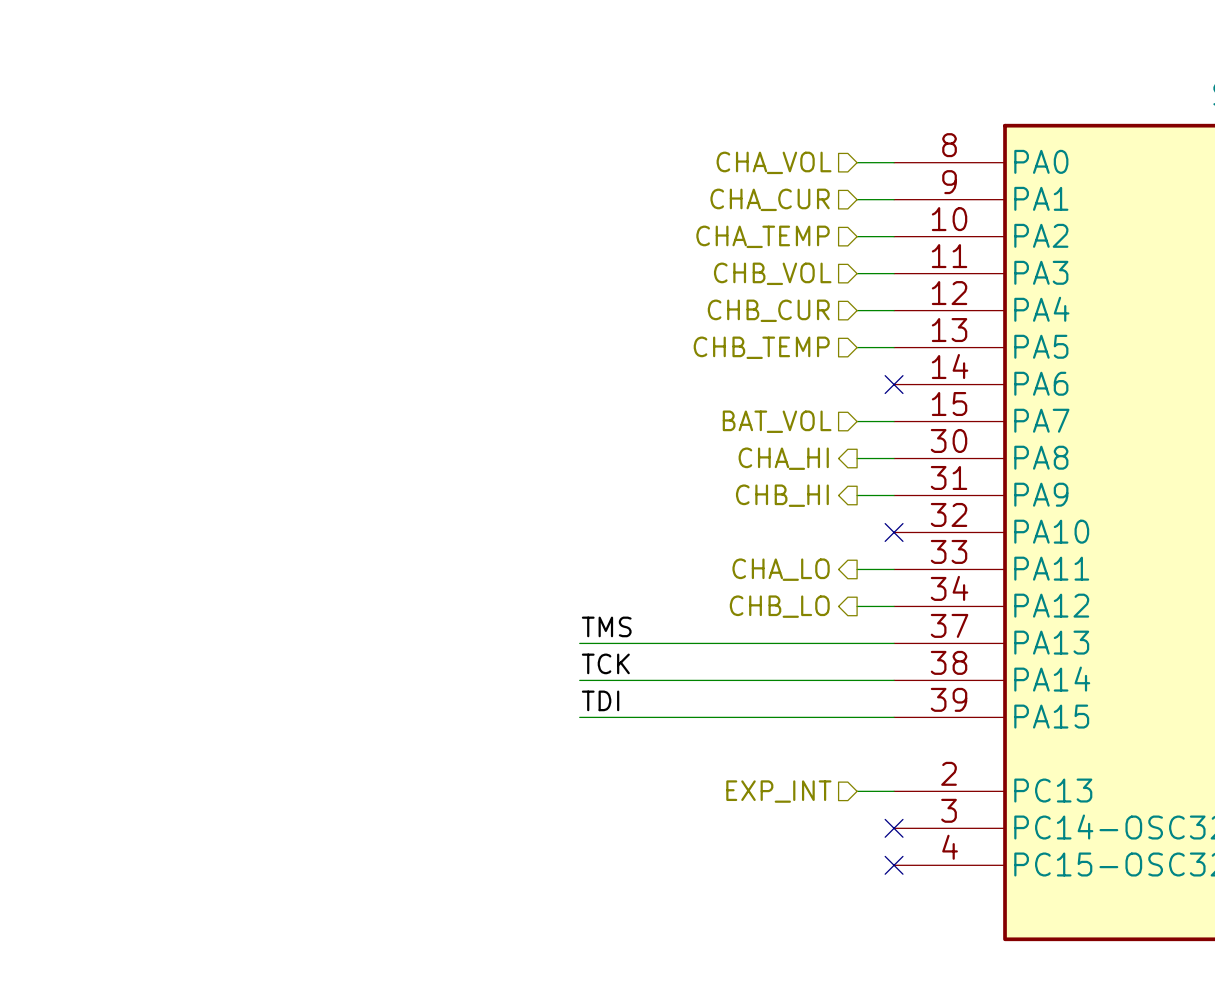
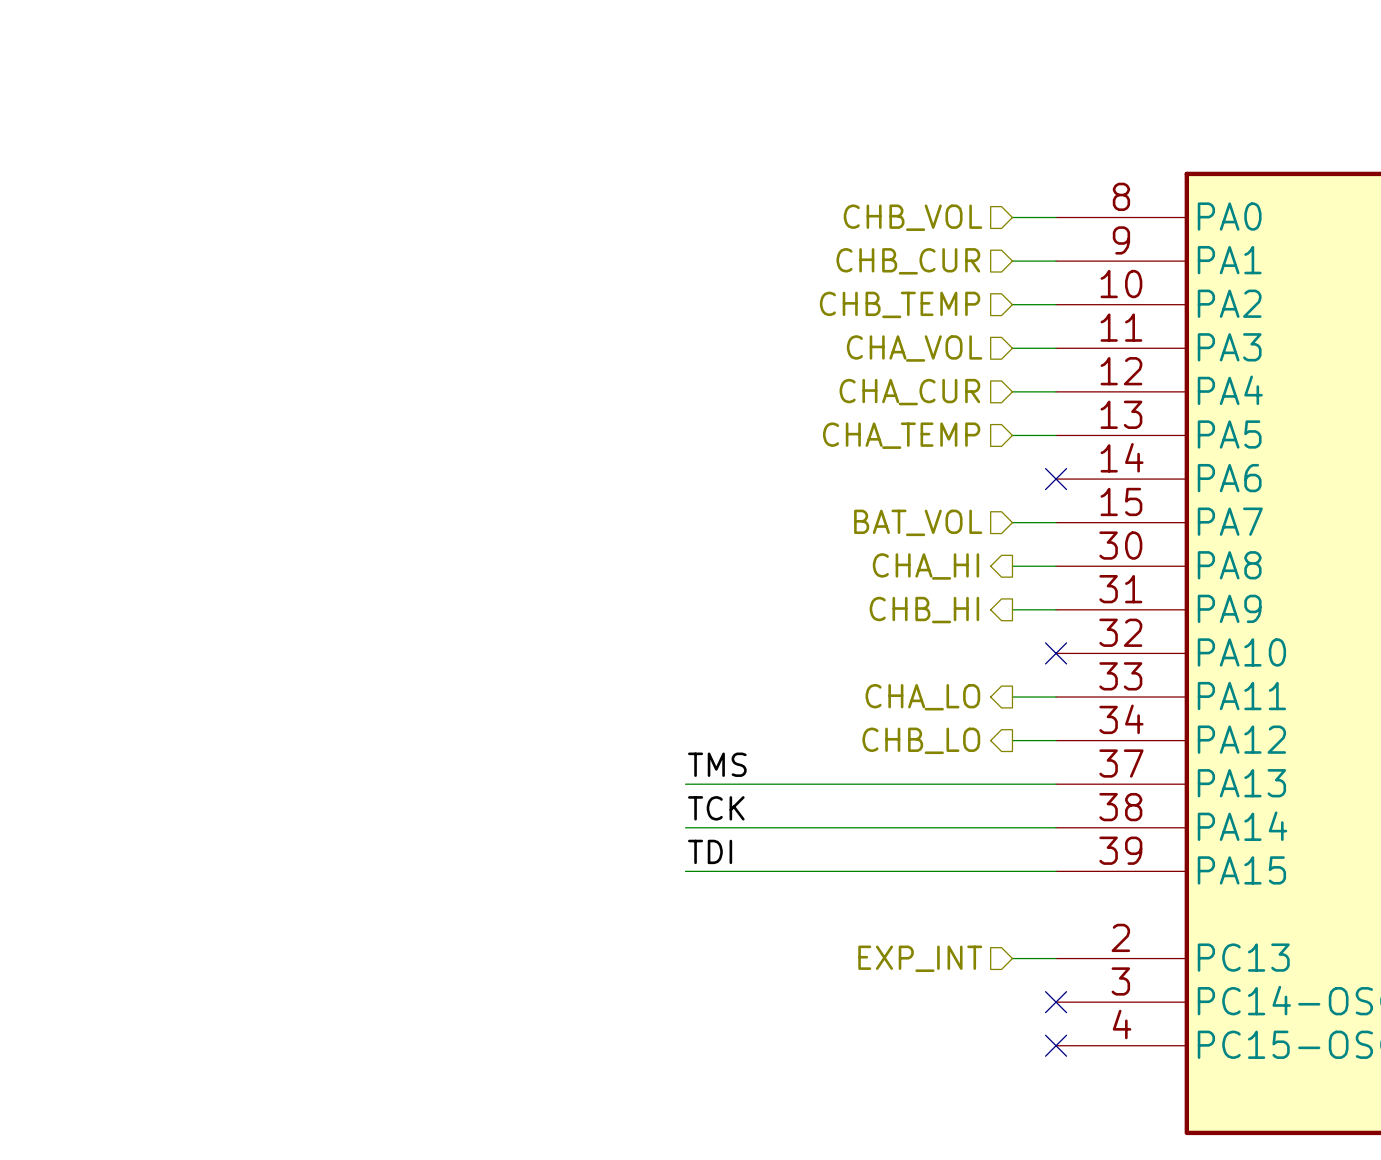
hierarchical label: CHA_VOL (774, 162) -> CHB_VOL (913, 217)
hierarchical label: CHA_CUR (770, 199) -> CHB_CUR (908, 261)
hierarchical label: CHA_TEMP (763, 236) -> CHB_TEMP (900, 304)
hierarchical label: CHB_VOL (772, 273) -> CHA_VOL (914, 348)
hierarchical label: CHB_CUR (768, 310) -> CHA_CUR (909, 392)
hierarchical label: CHB_TEMP (761, 347) -> CHA_TEMP (901, 435)

